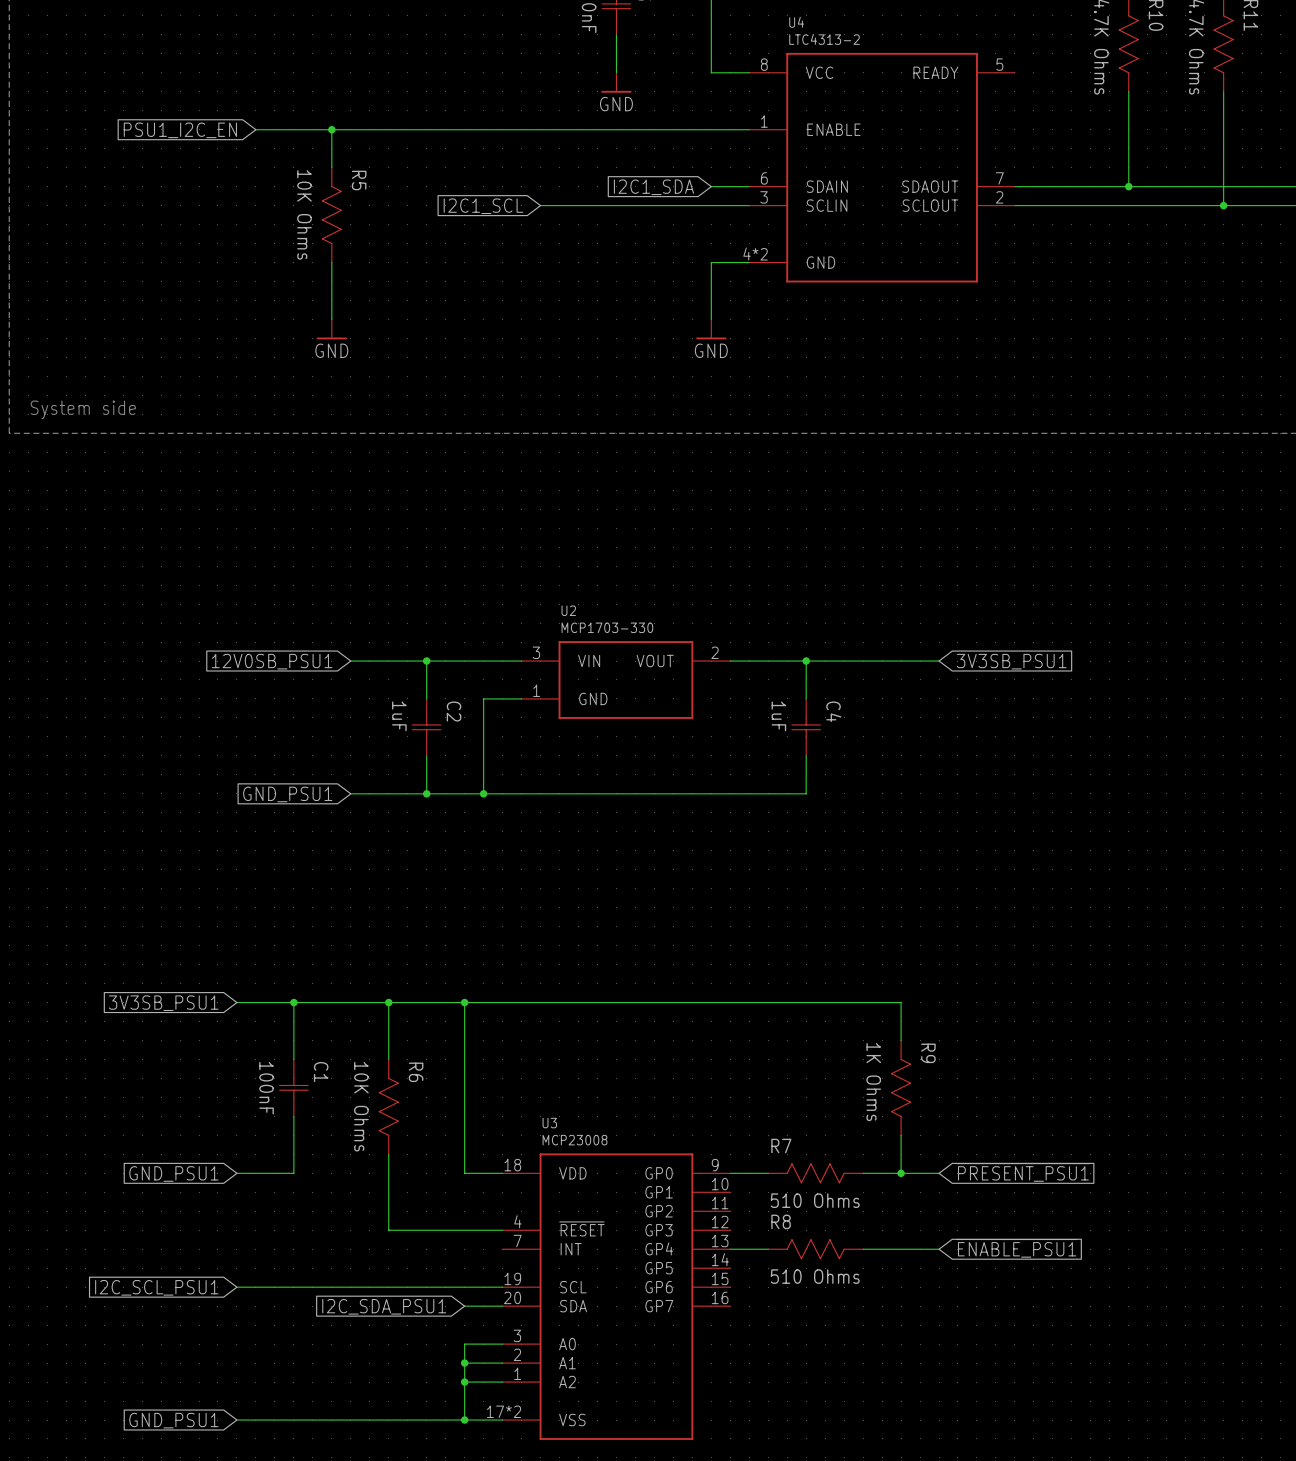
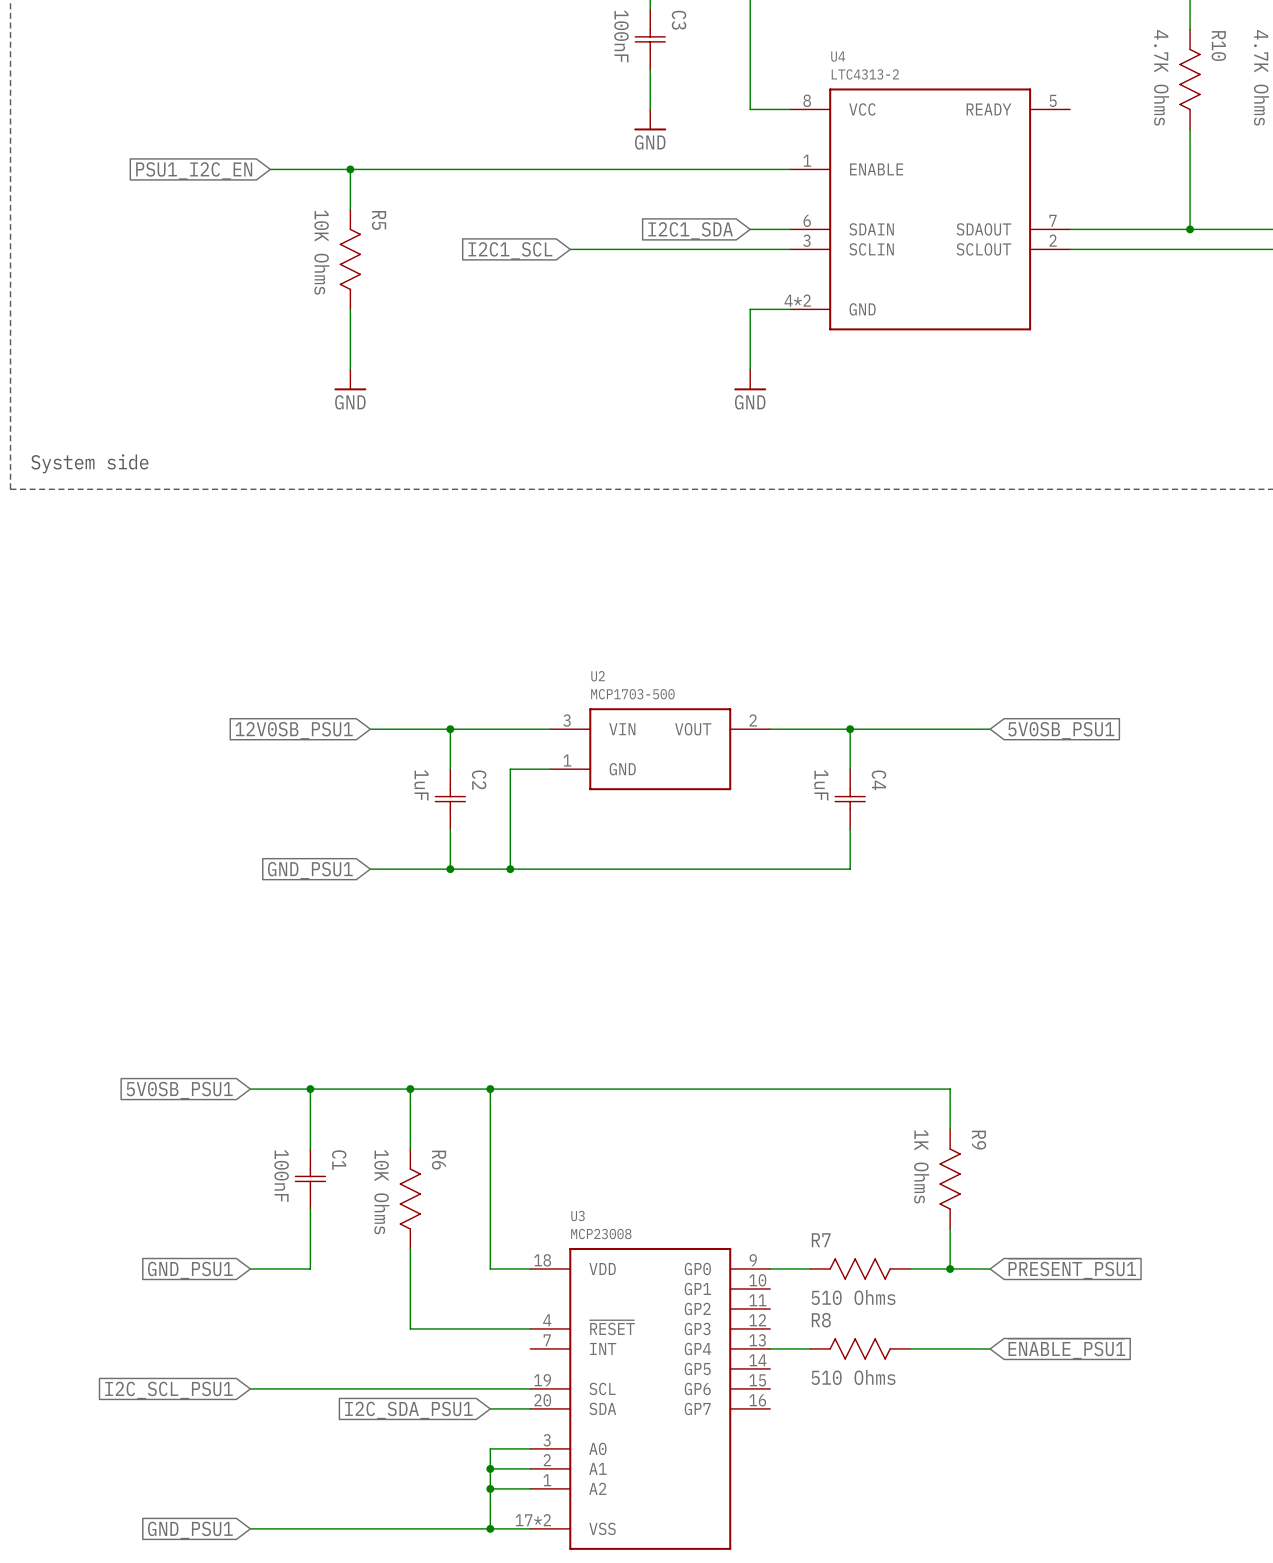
U2 value: MCP1703-330 (607, 627) -> MCP1703-500 (632, 694)
global label: 3V3SB_PSU1 (1011, 661) -> 5V0SB_PSU1 (1061, 730)
global label: 3V3SB_PSU1 (163, 1003) -> 5V0SB_PSU1 (179, 1090)

